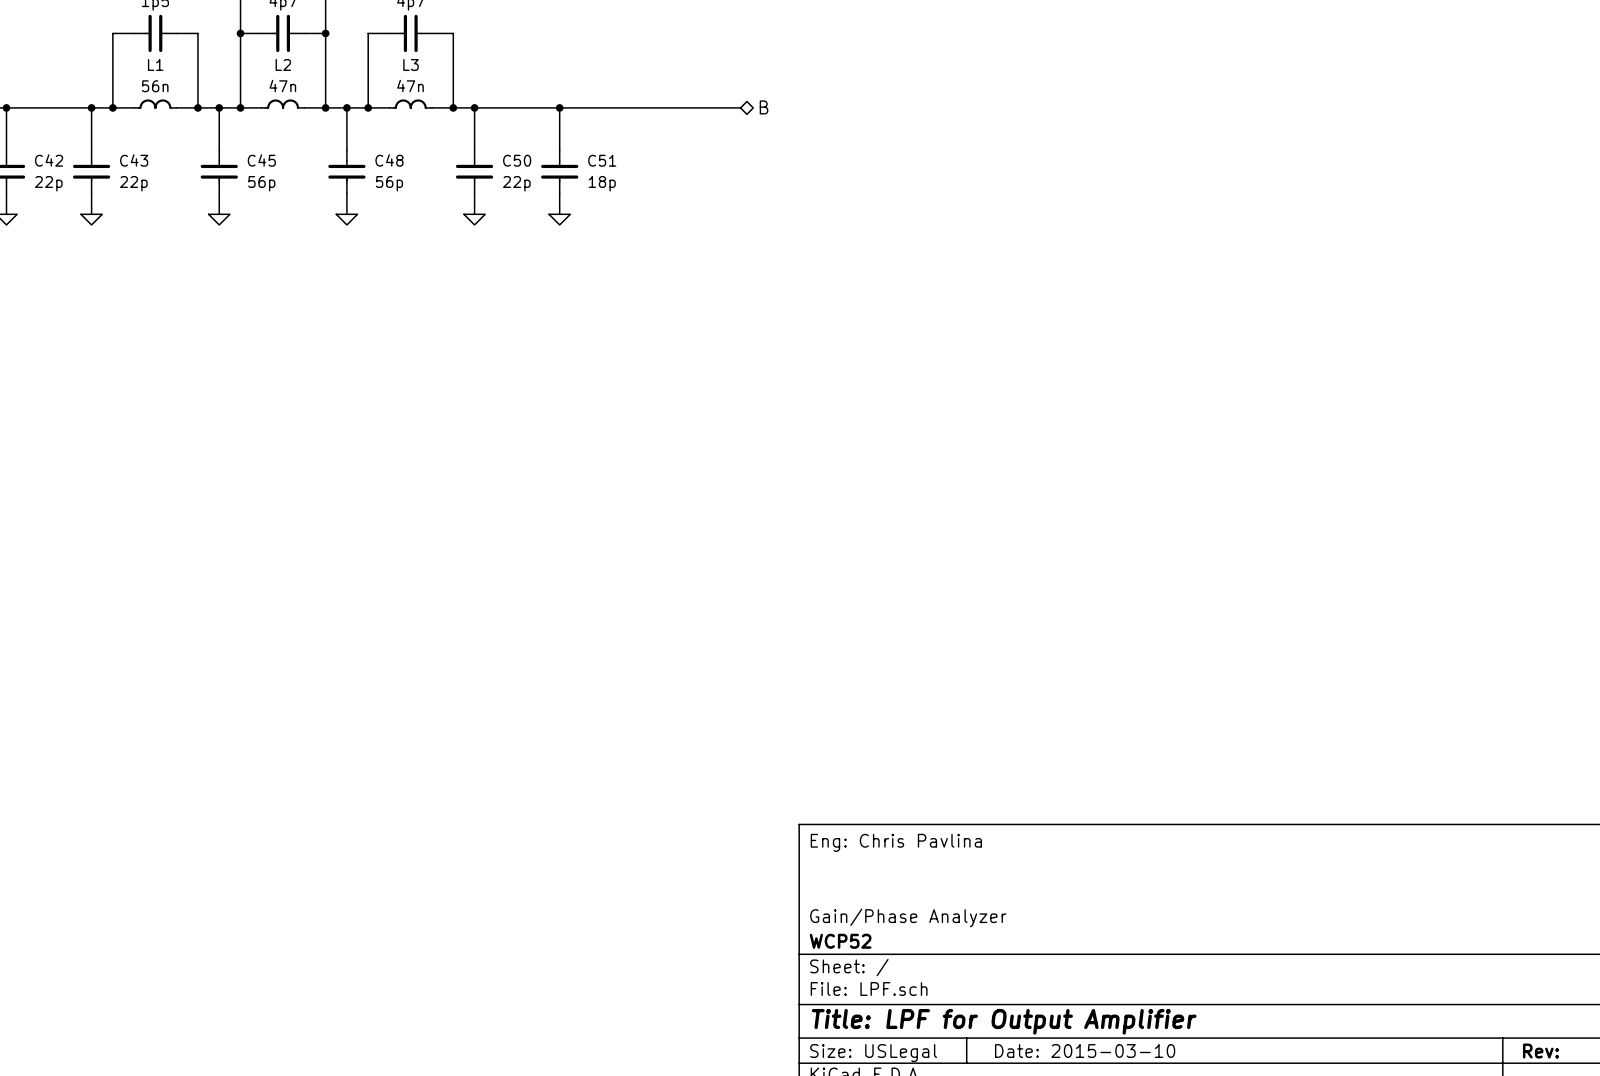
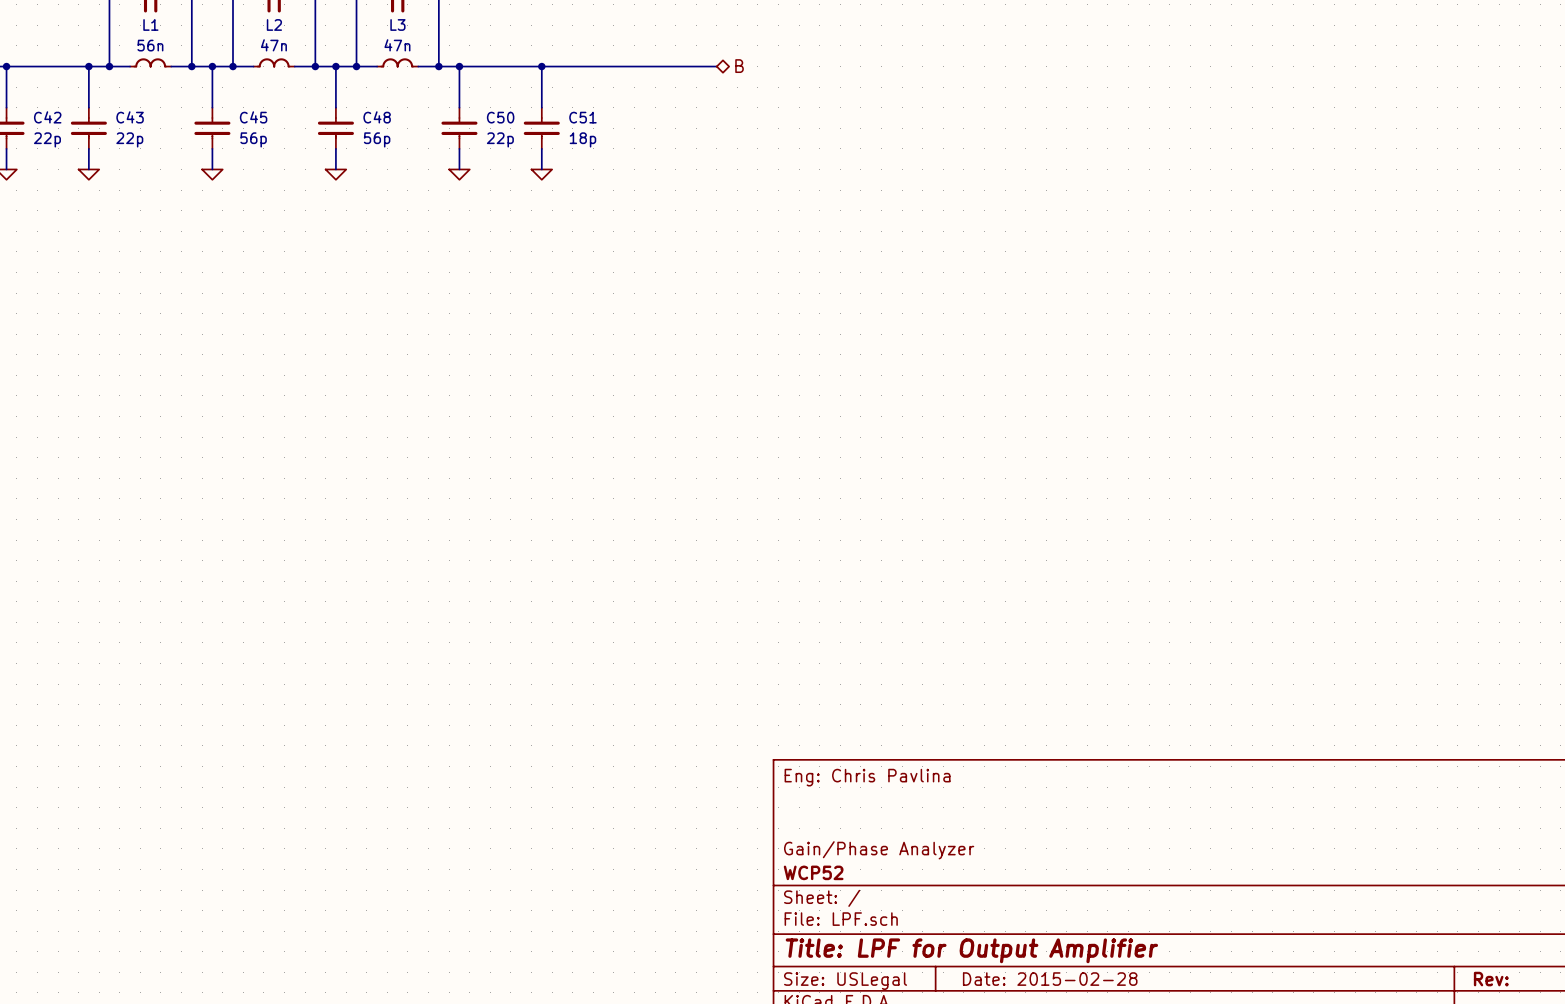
title block: Date: 2015-03-10 (1085, 1051) -> Date: 2015-02-28 (1050, 979)

